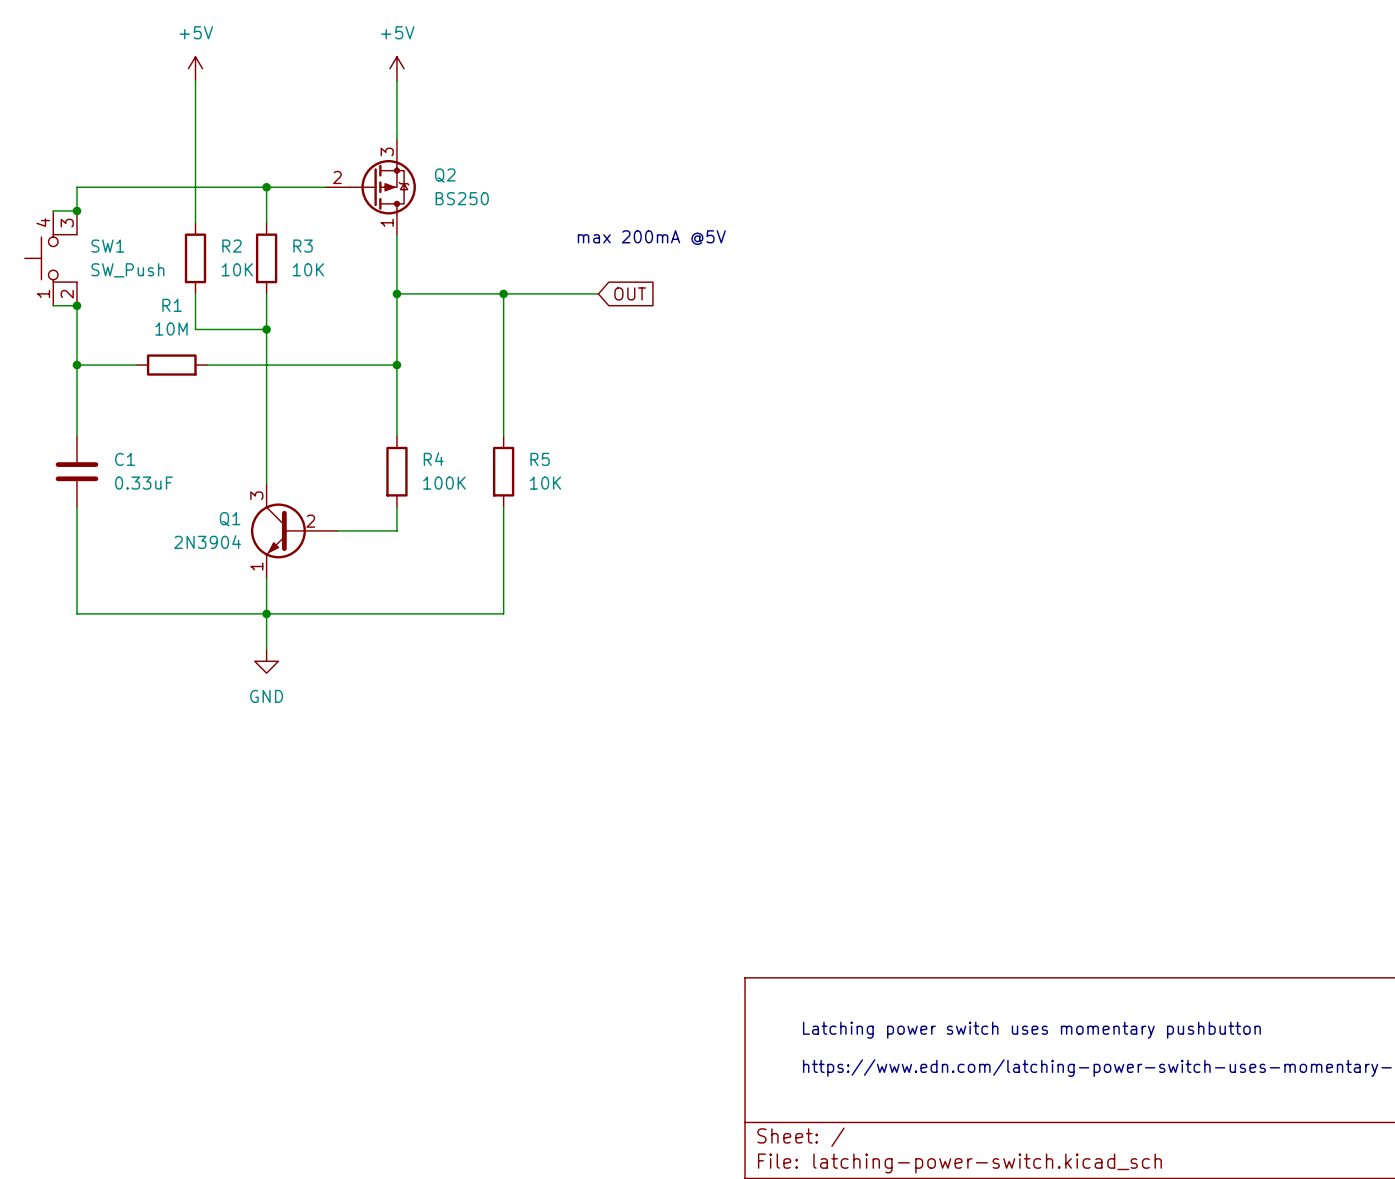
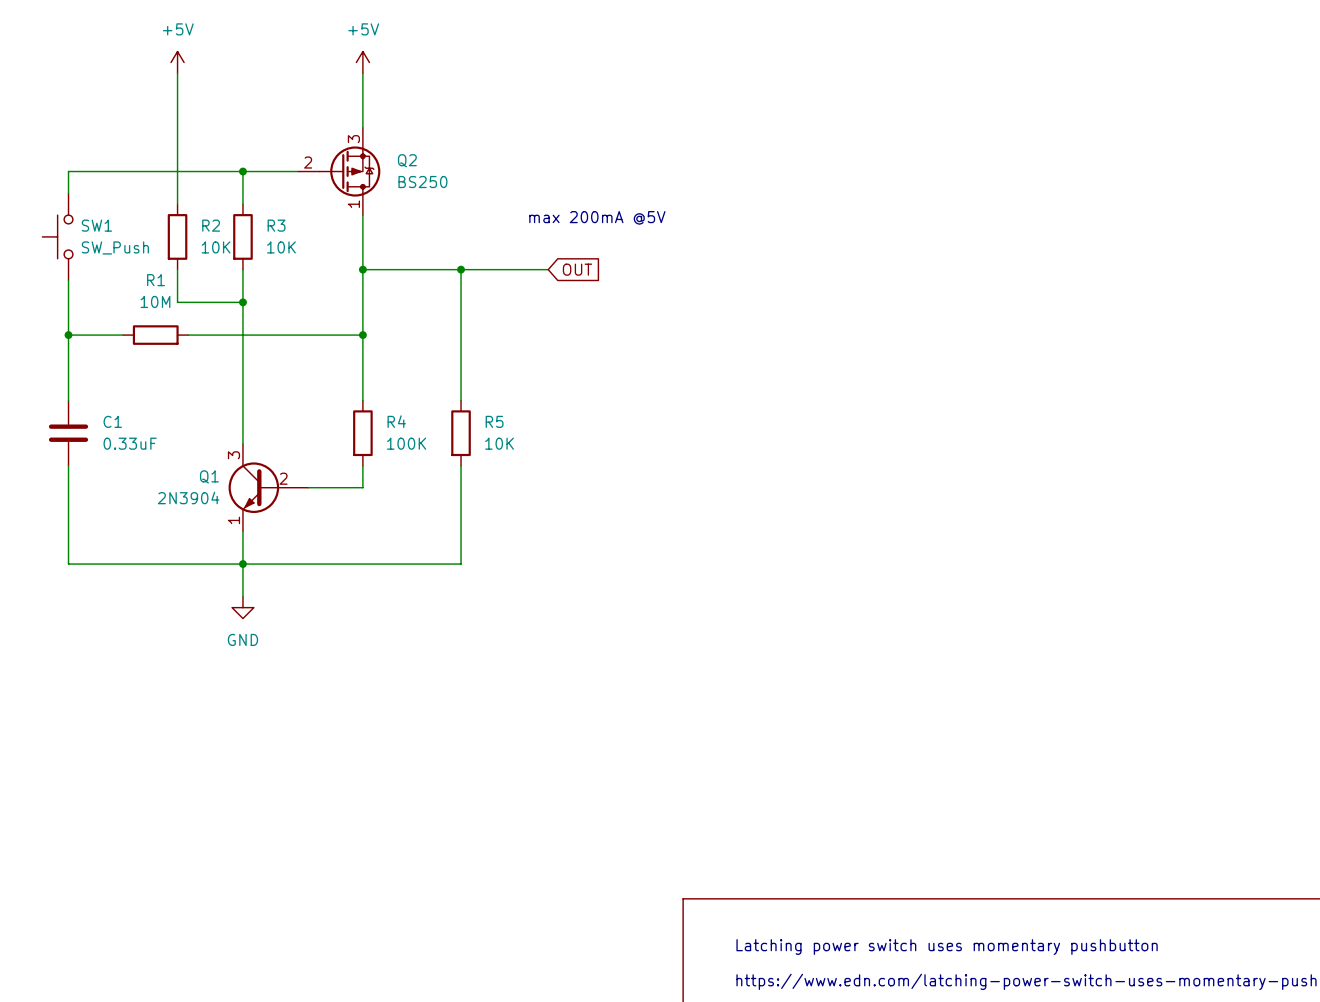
SW1 symbol: [24, 210, 77, 306] -> [42, 193, 73, 281]
wire: (53, 210) (76, 210) -> none
junction: (76, 210) -> none
wire: (53, 305) (76, 305) -> none
junction: (76, 305) -> none

